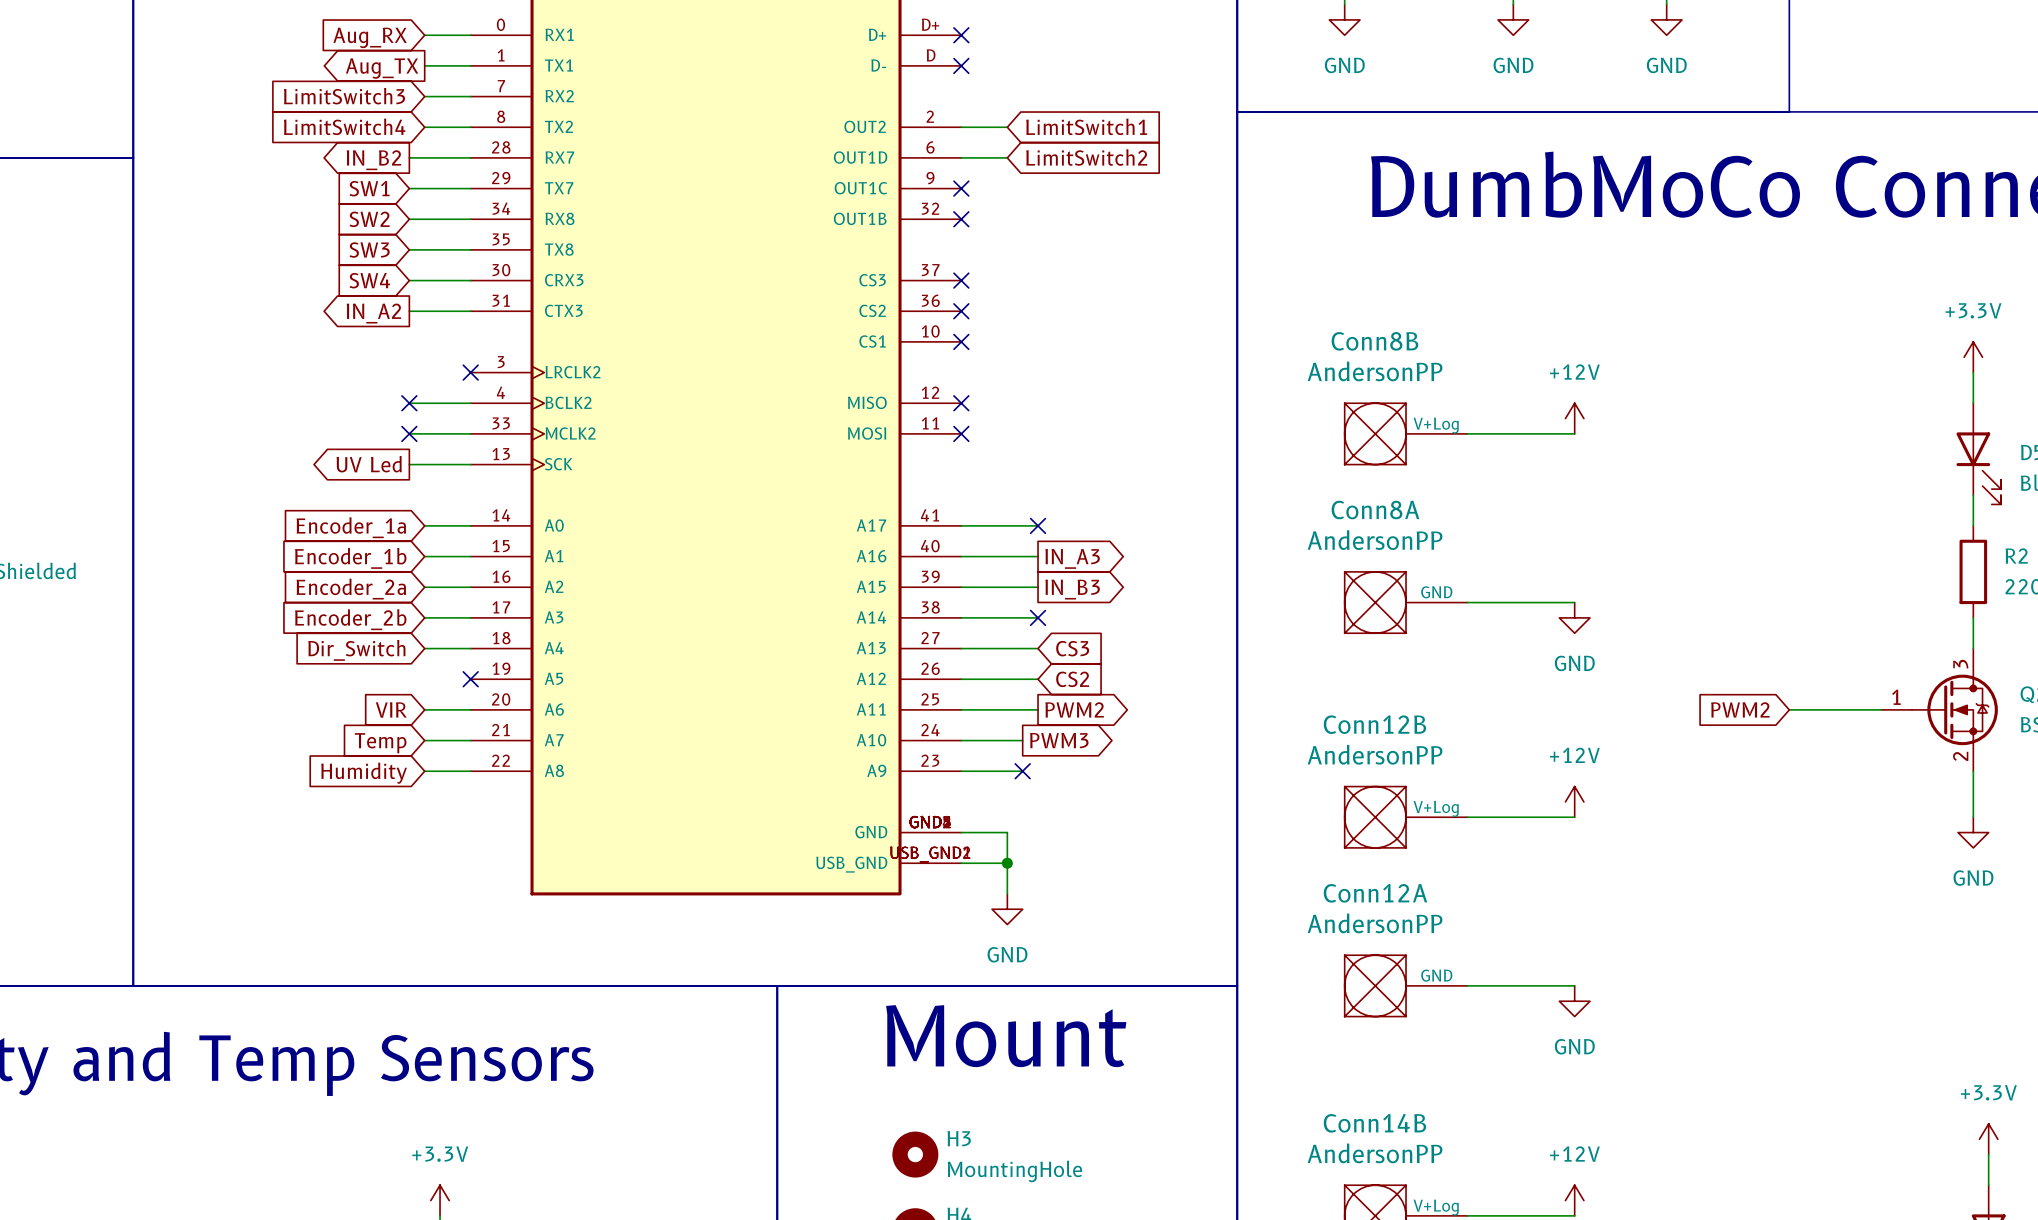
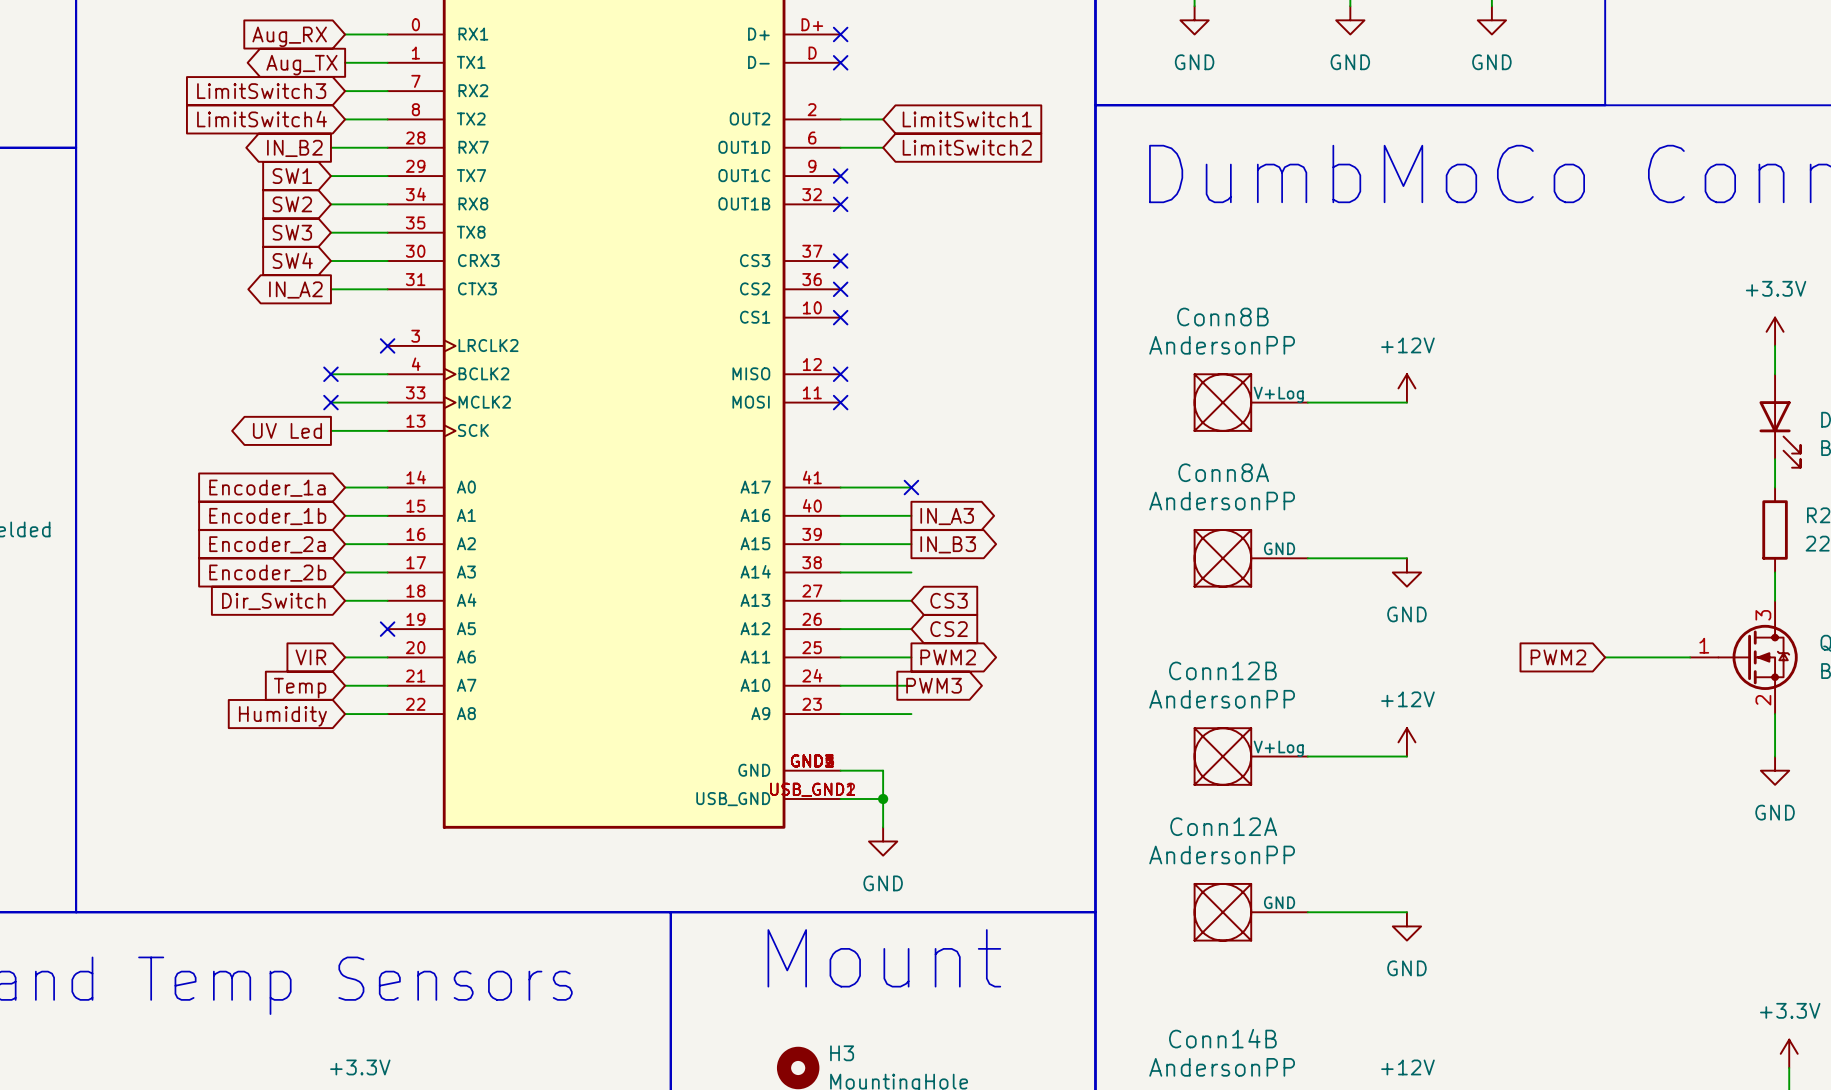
no-connect mark: (1038, 617) -> none
wire: none -> (897, 685) (911, 685)
wire: none -> (897, 714) (911, 714)
no-connect mark: (1022, 771) -> none

